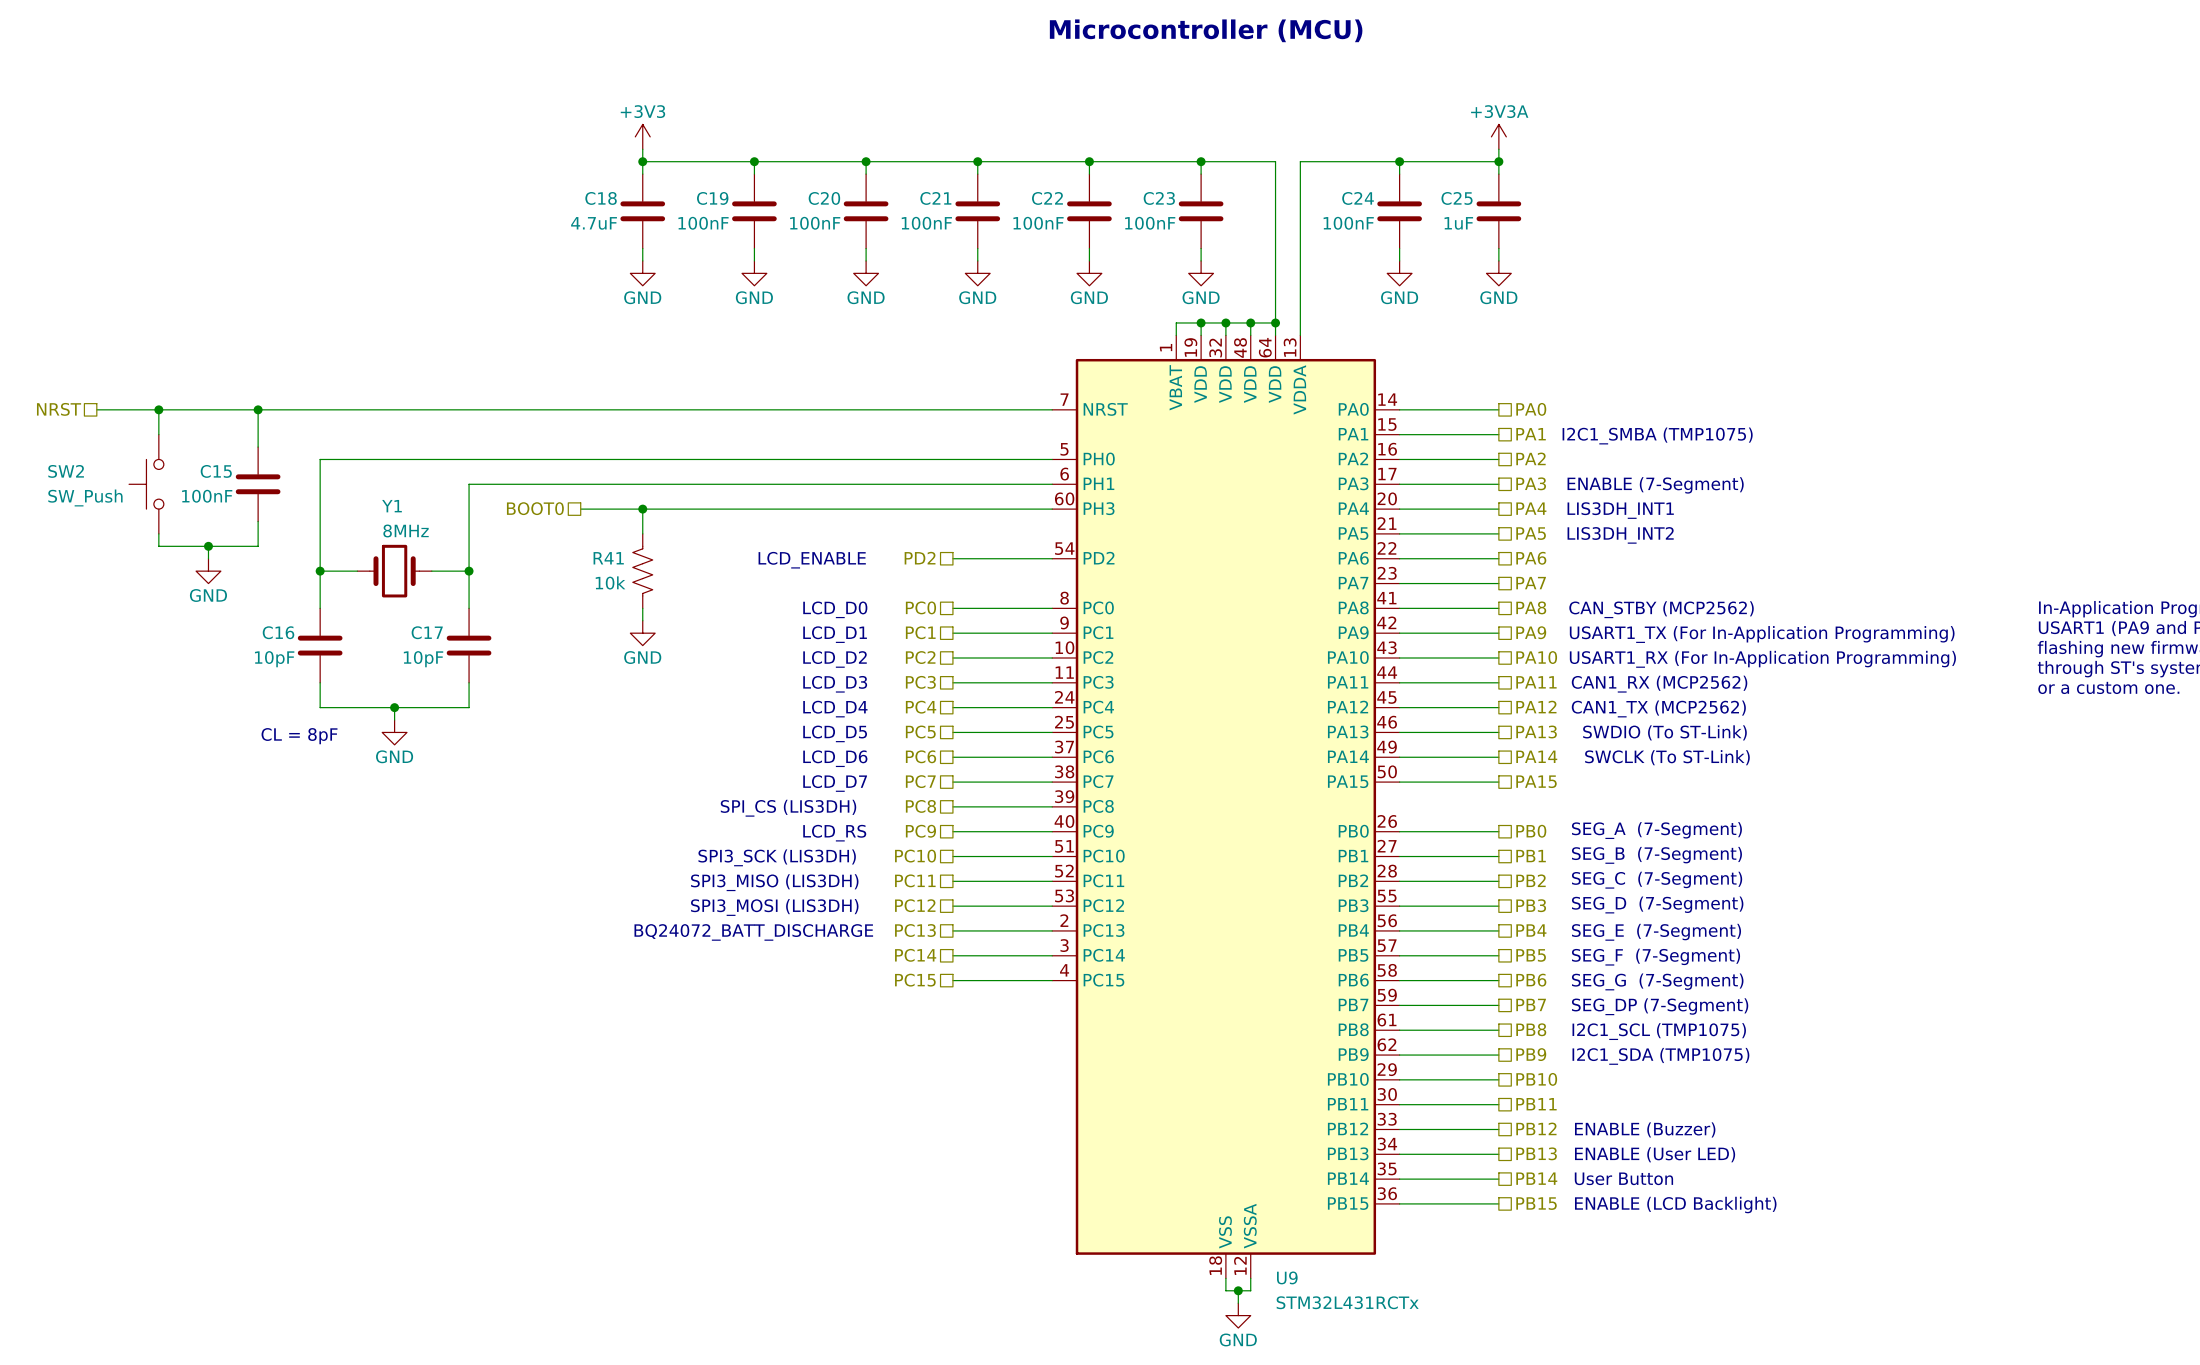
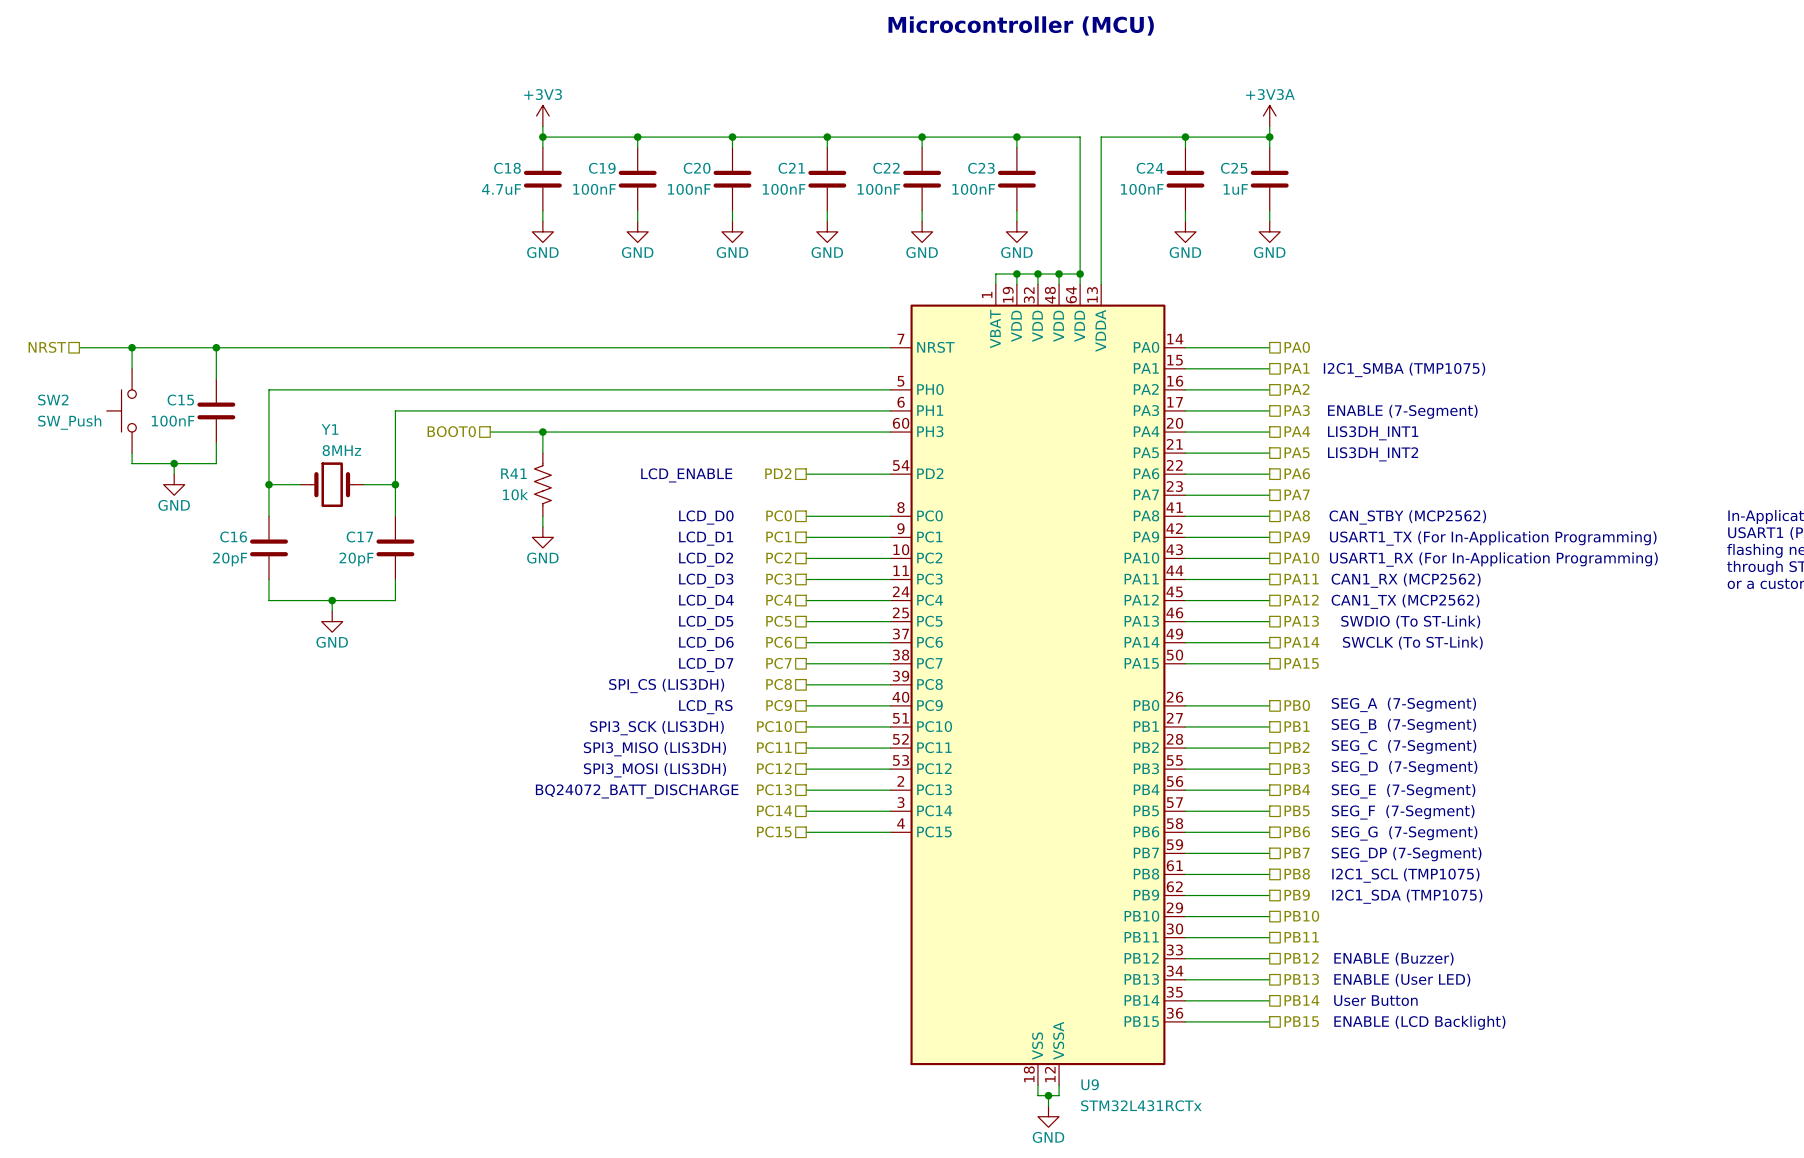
C16 value: 10pF (274, 659) -> 20pF (230, 559)
C17 value: 10pF (423, 659) -> 20pF (356, 559)
text: CL = 8pF (299, 736) -> none

